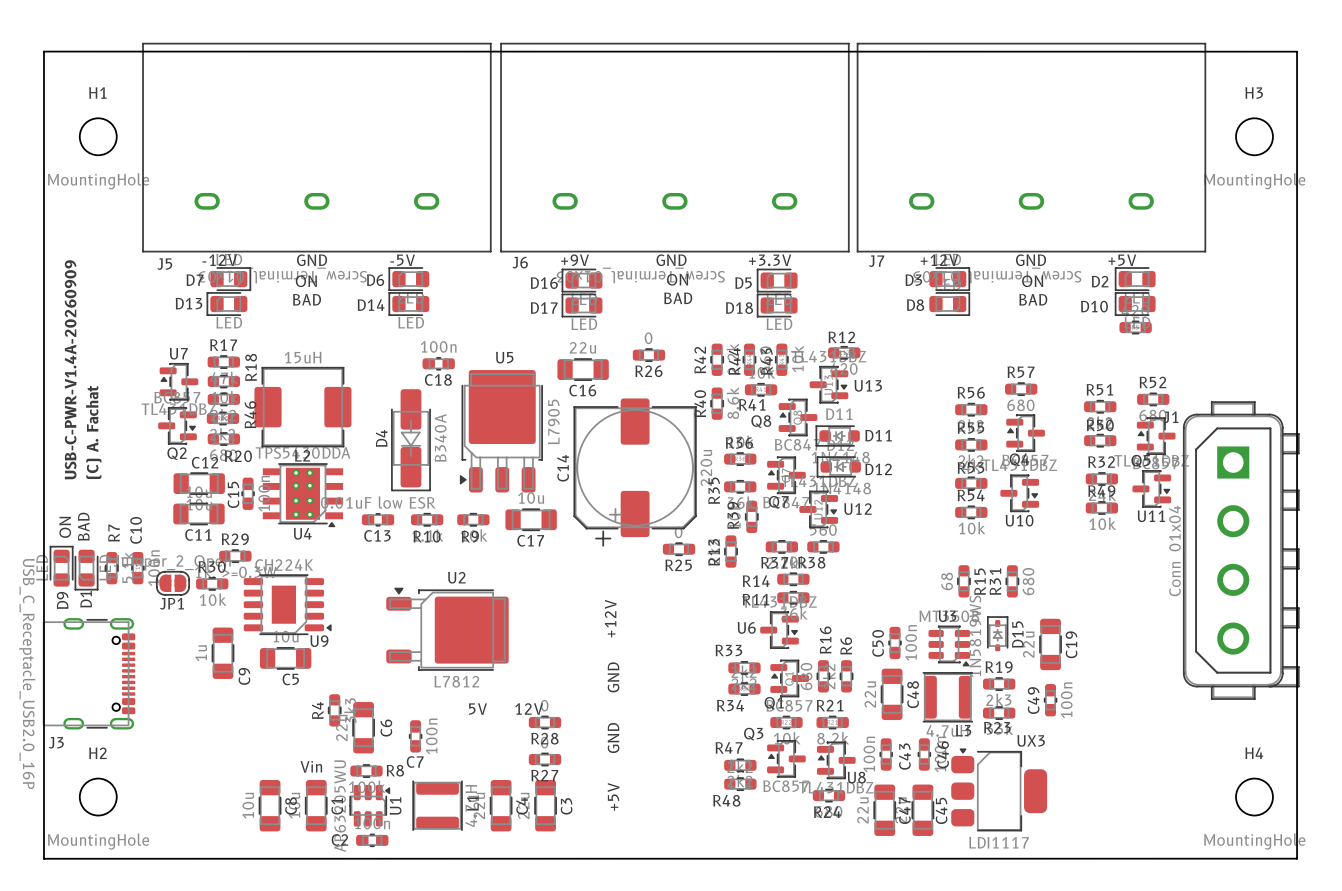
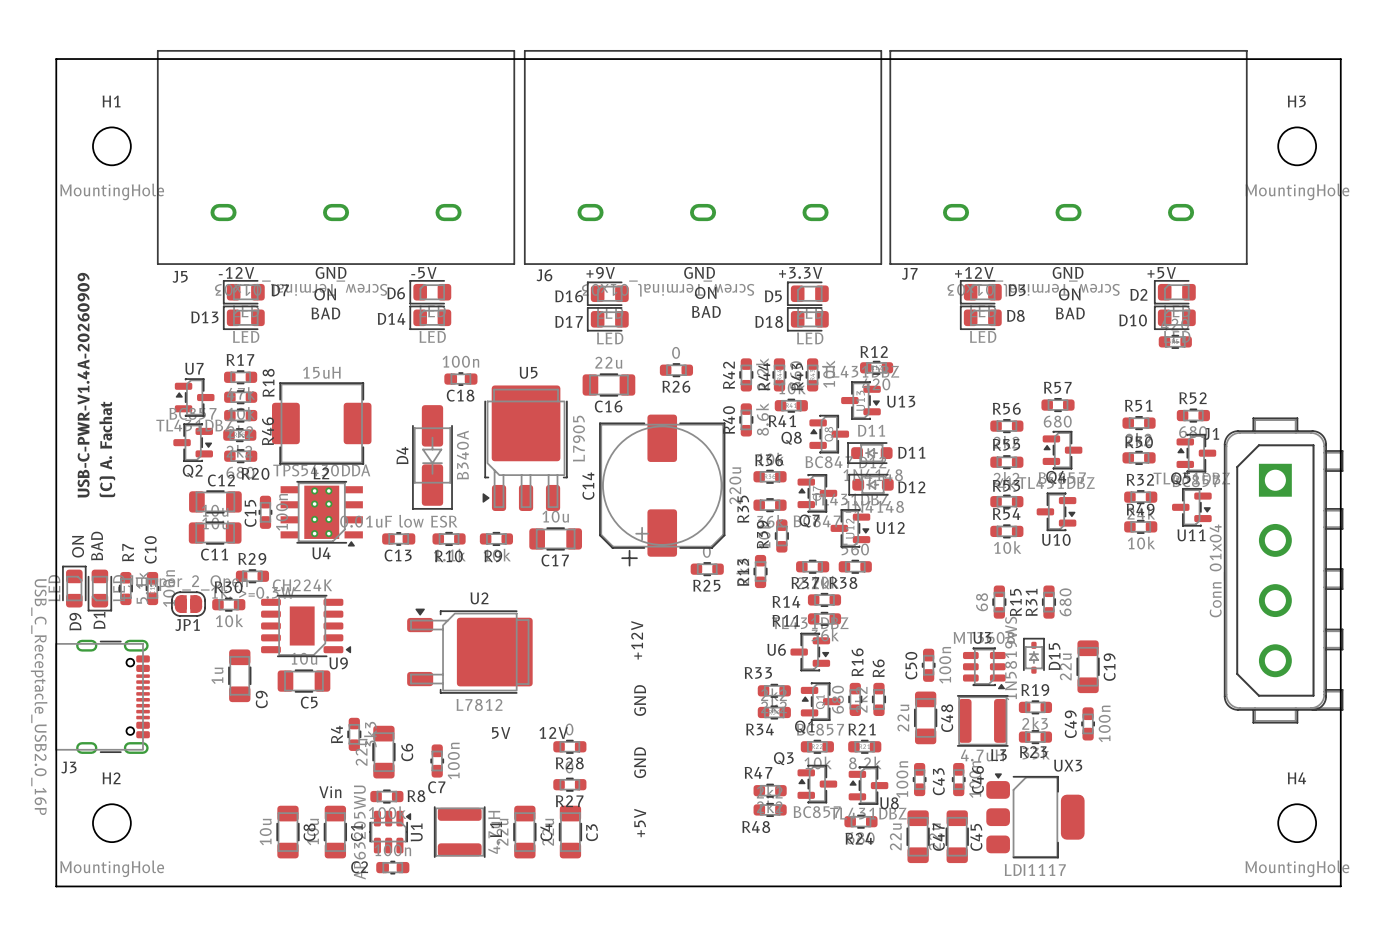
D7 rotation: 0° (230, 279) -> 180° (243, 292)
D3 rotation: 0° (949, 279) -> 180° (980, 292)
D8 rotation: 0° (949, 304) -> 180° (980, 317)

